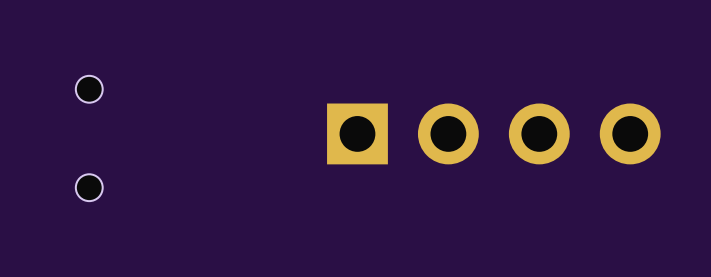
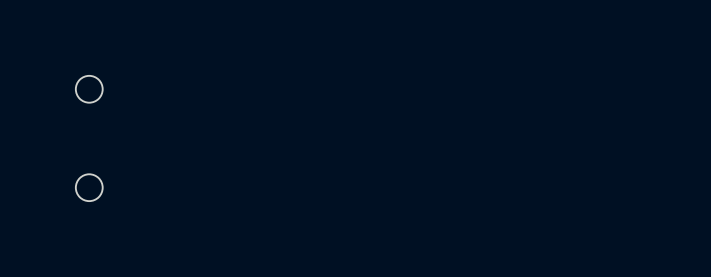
part: (493, 133) -> none

